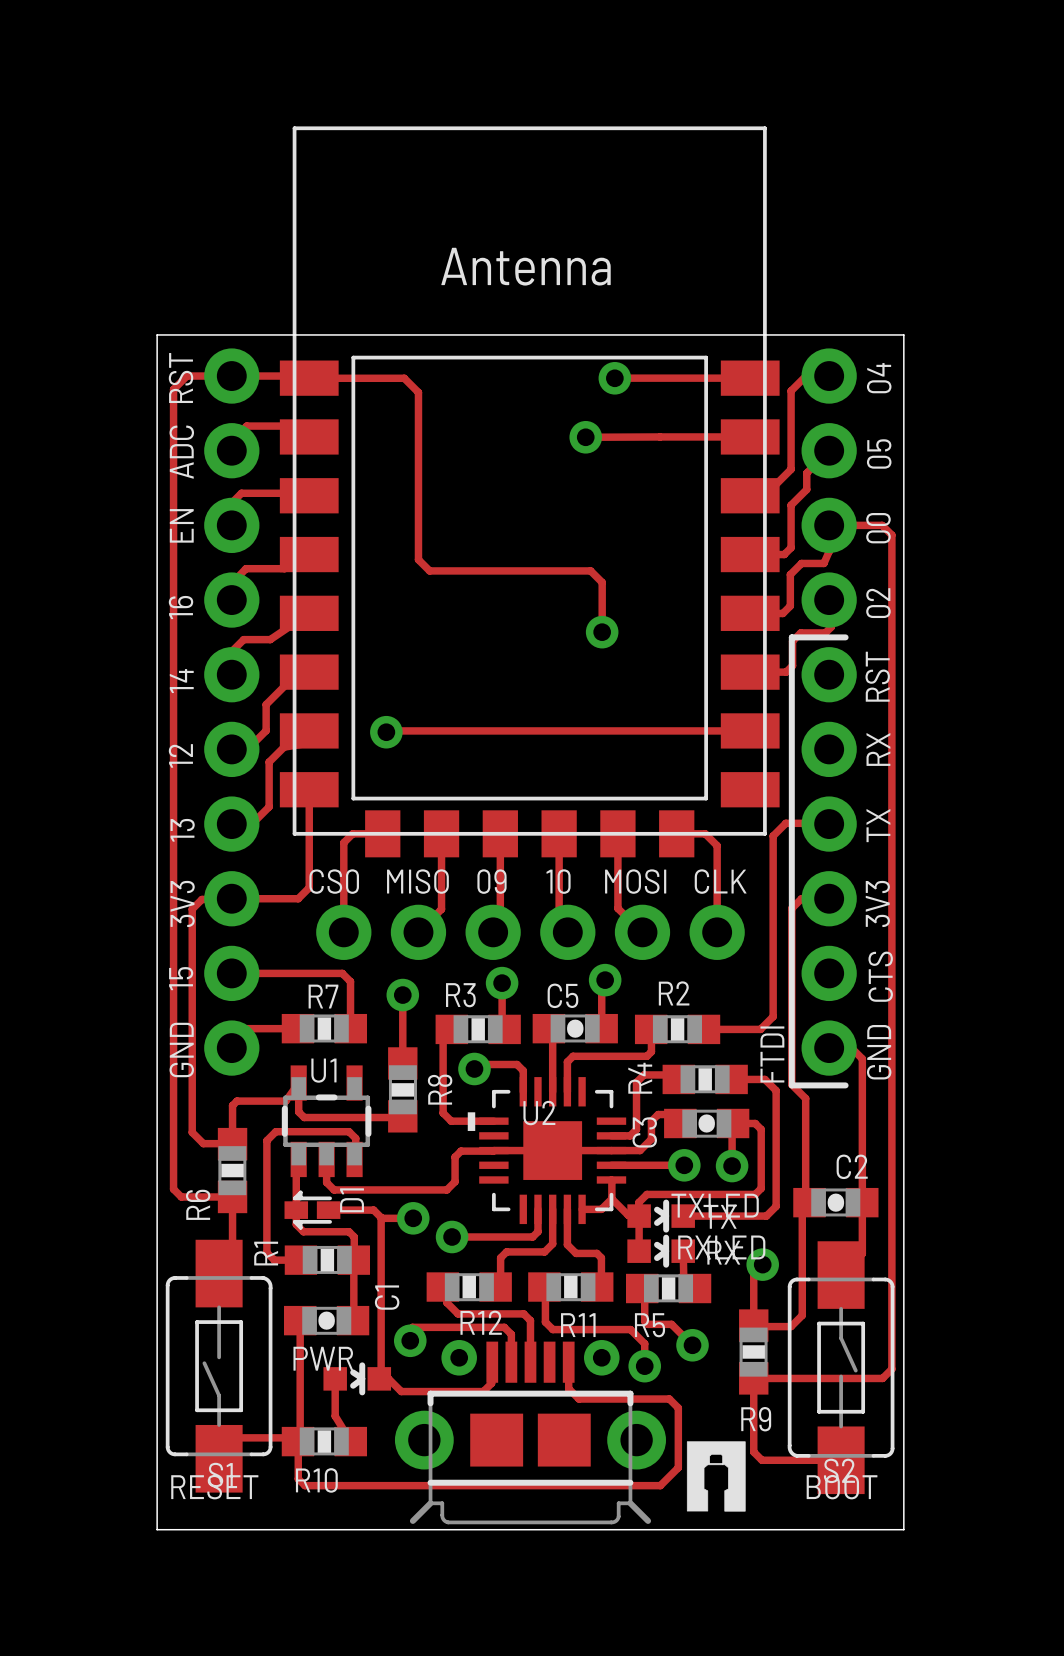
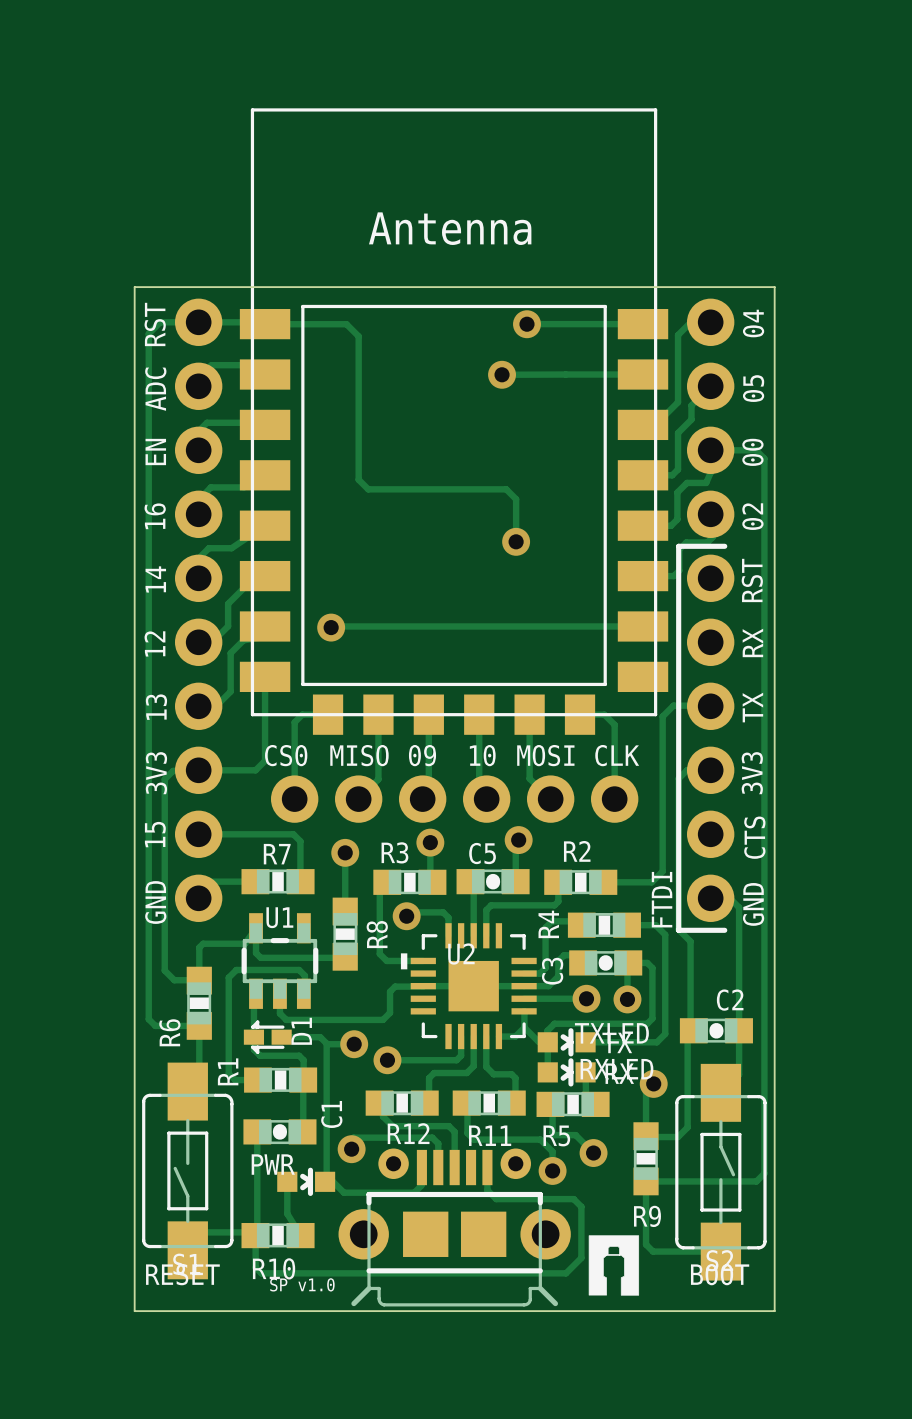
text: none -> SP v1.0 (302, 1284)

